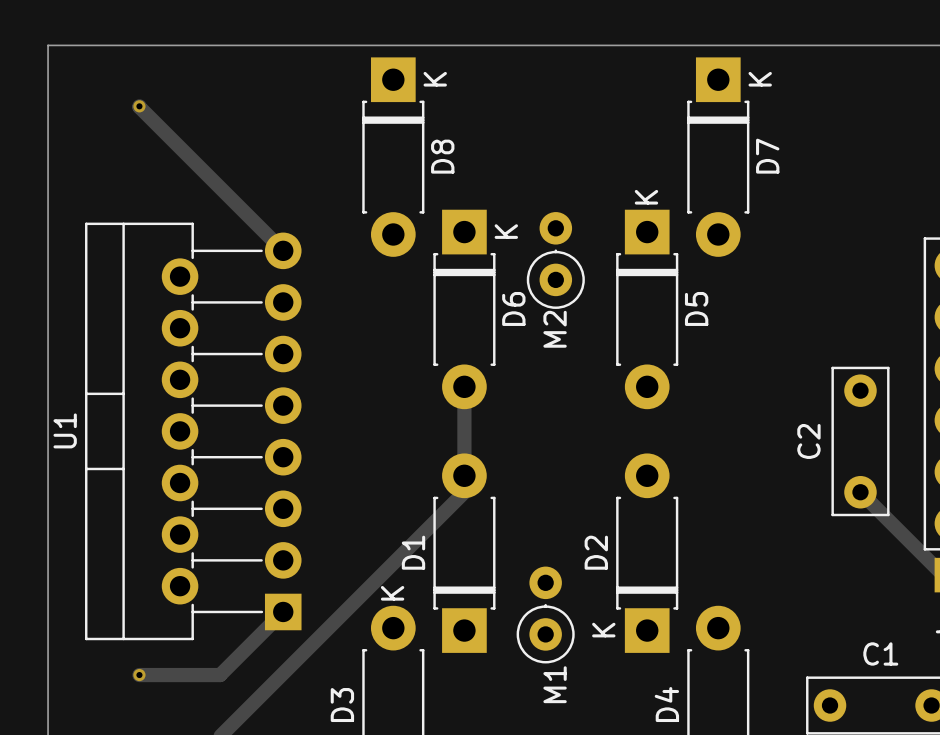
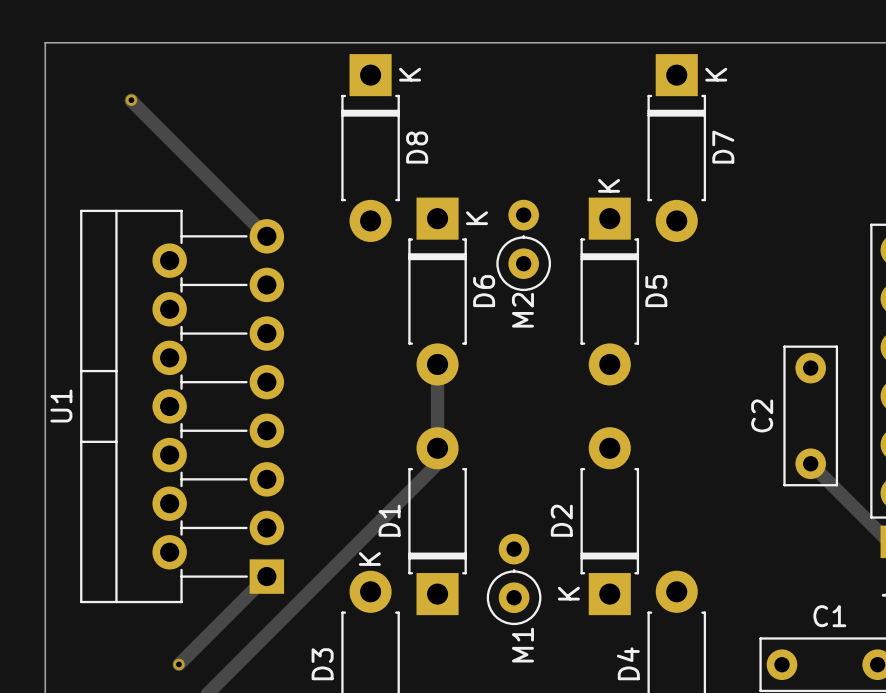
track: (139, 675) (220, 675) -> (178, 664) (207, 635)
via: (139, 675) -> none
via: none -> (178, 664)

